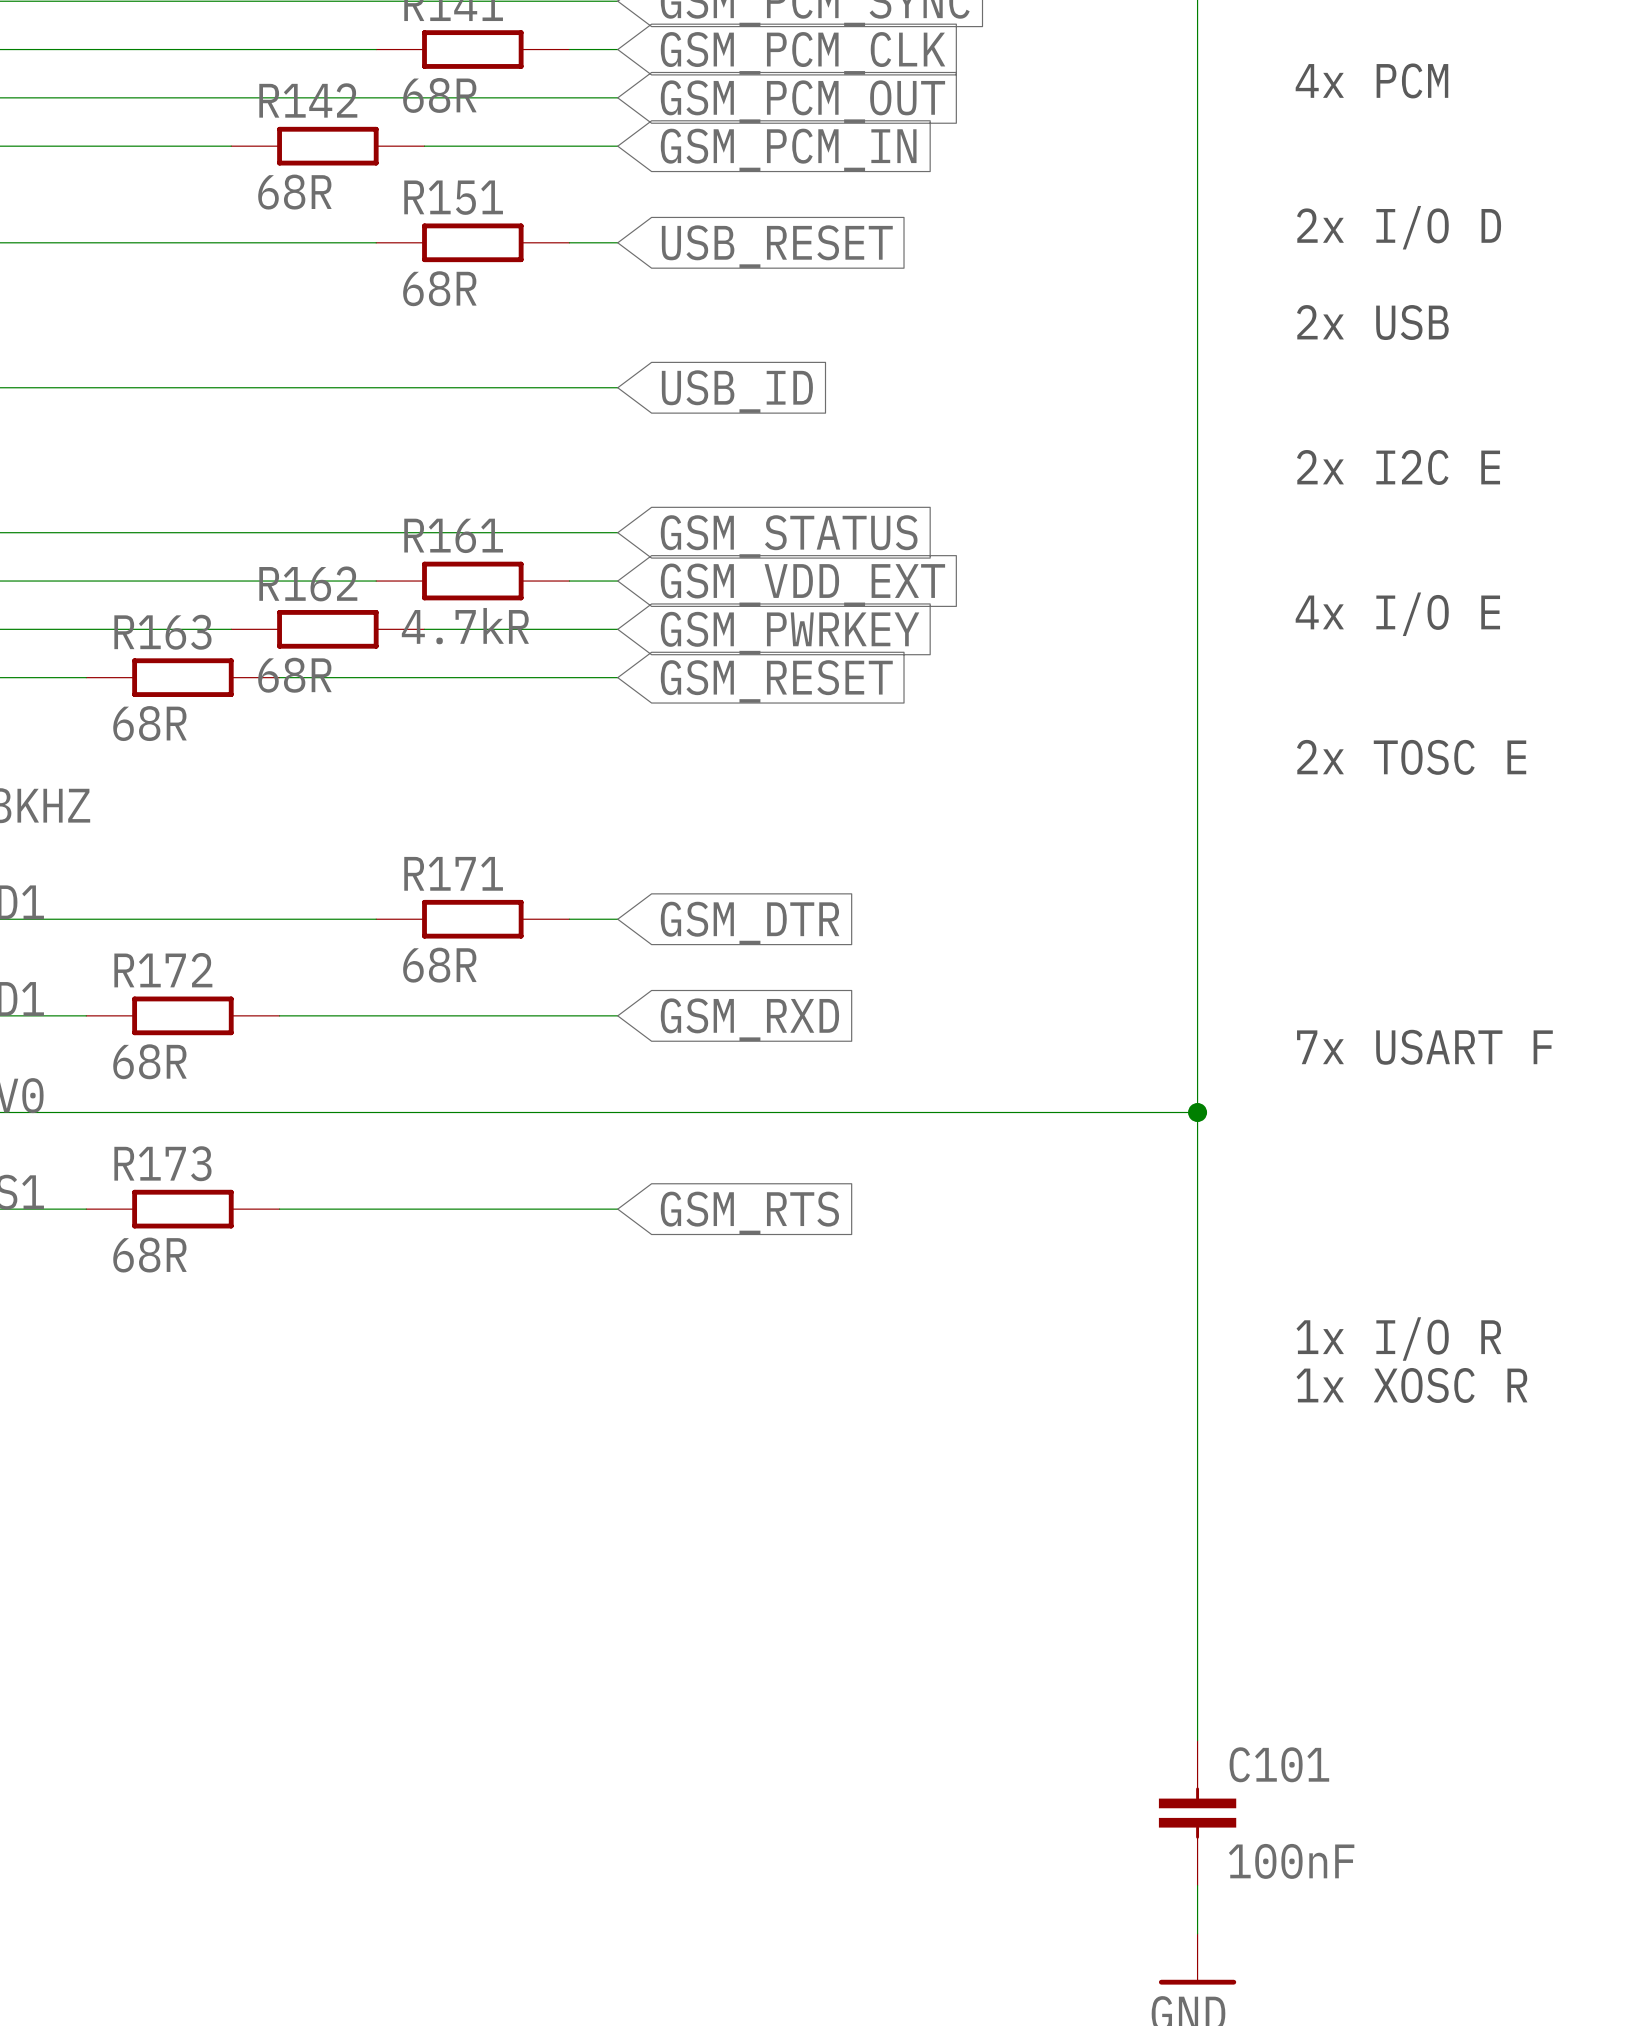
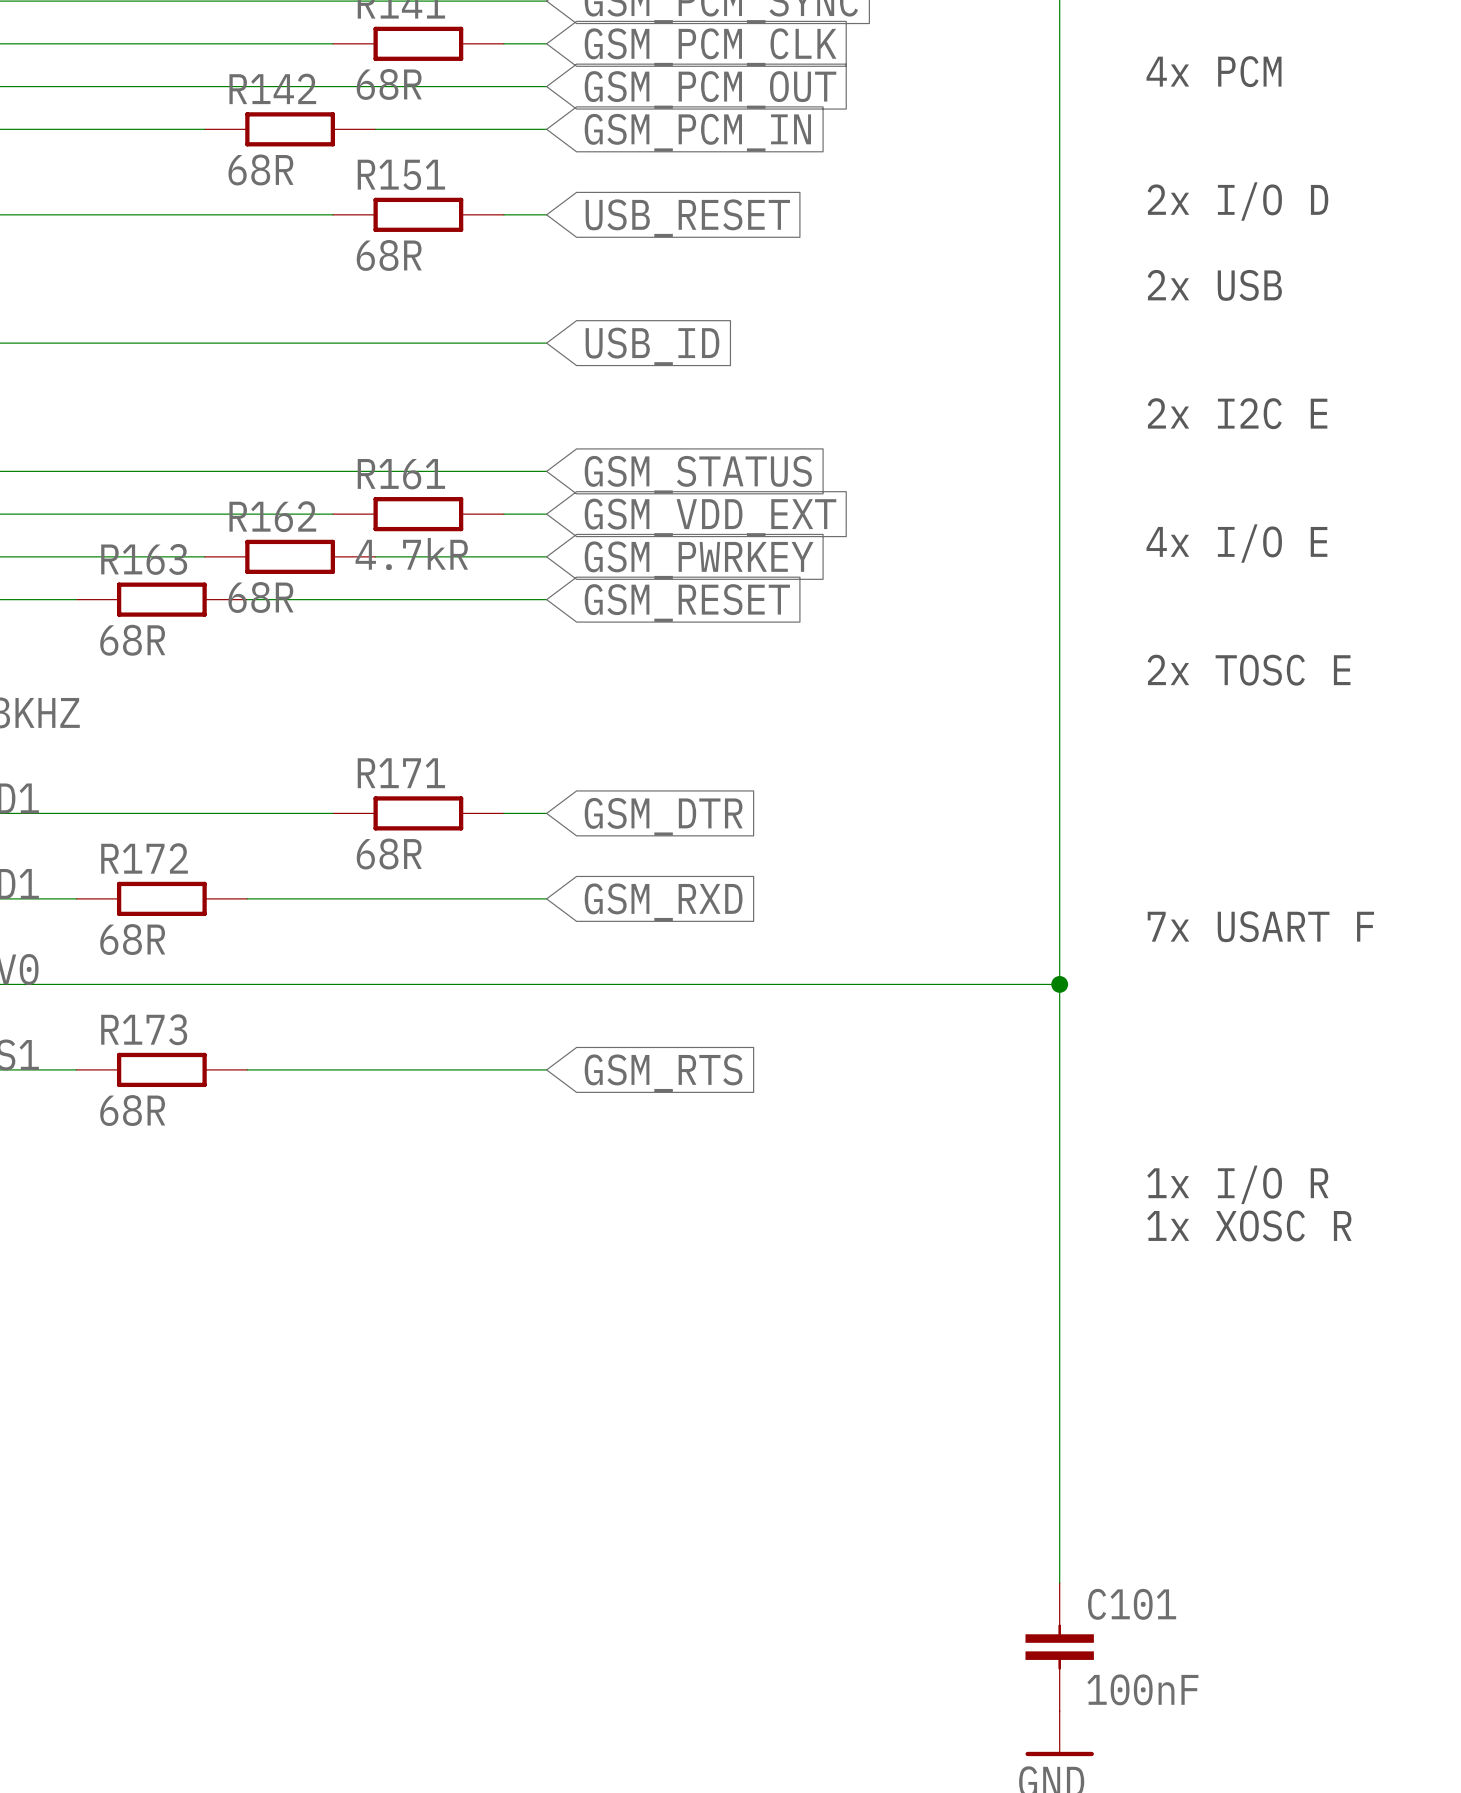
C101 position: (1197, 1813) -> (1059, 1647)

